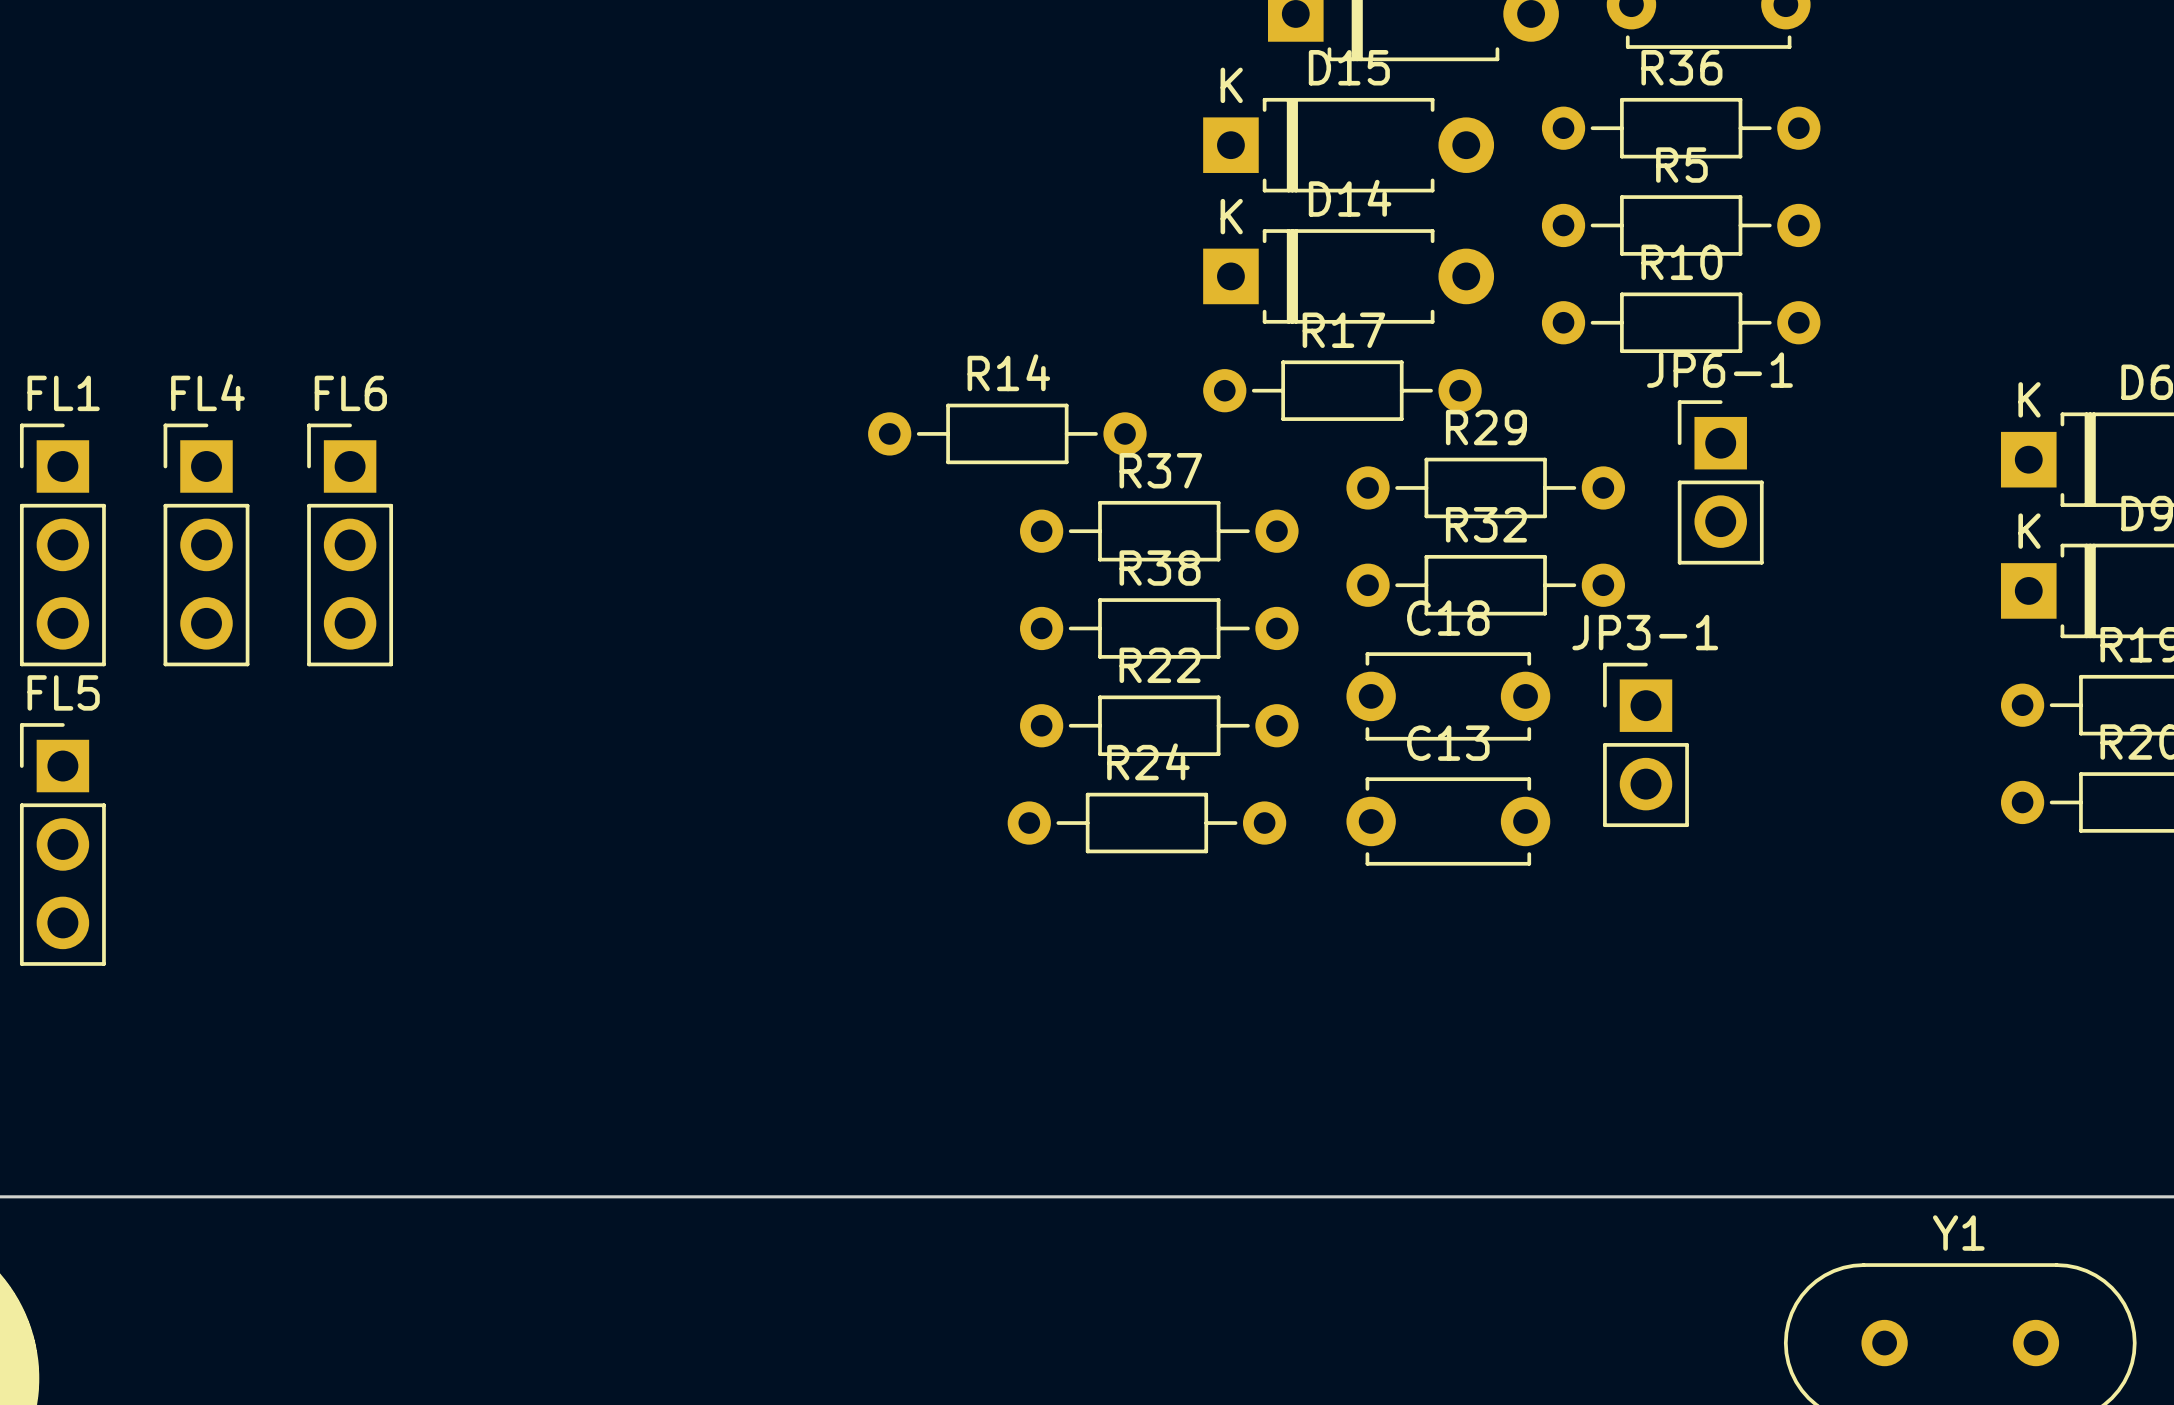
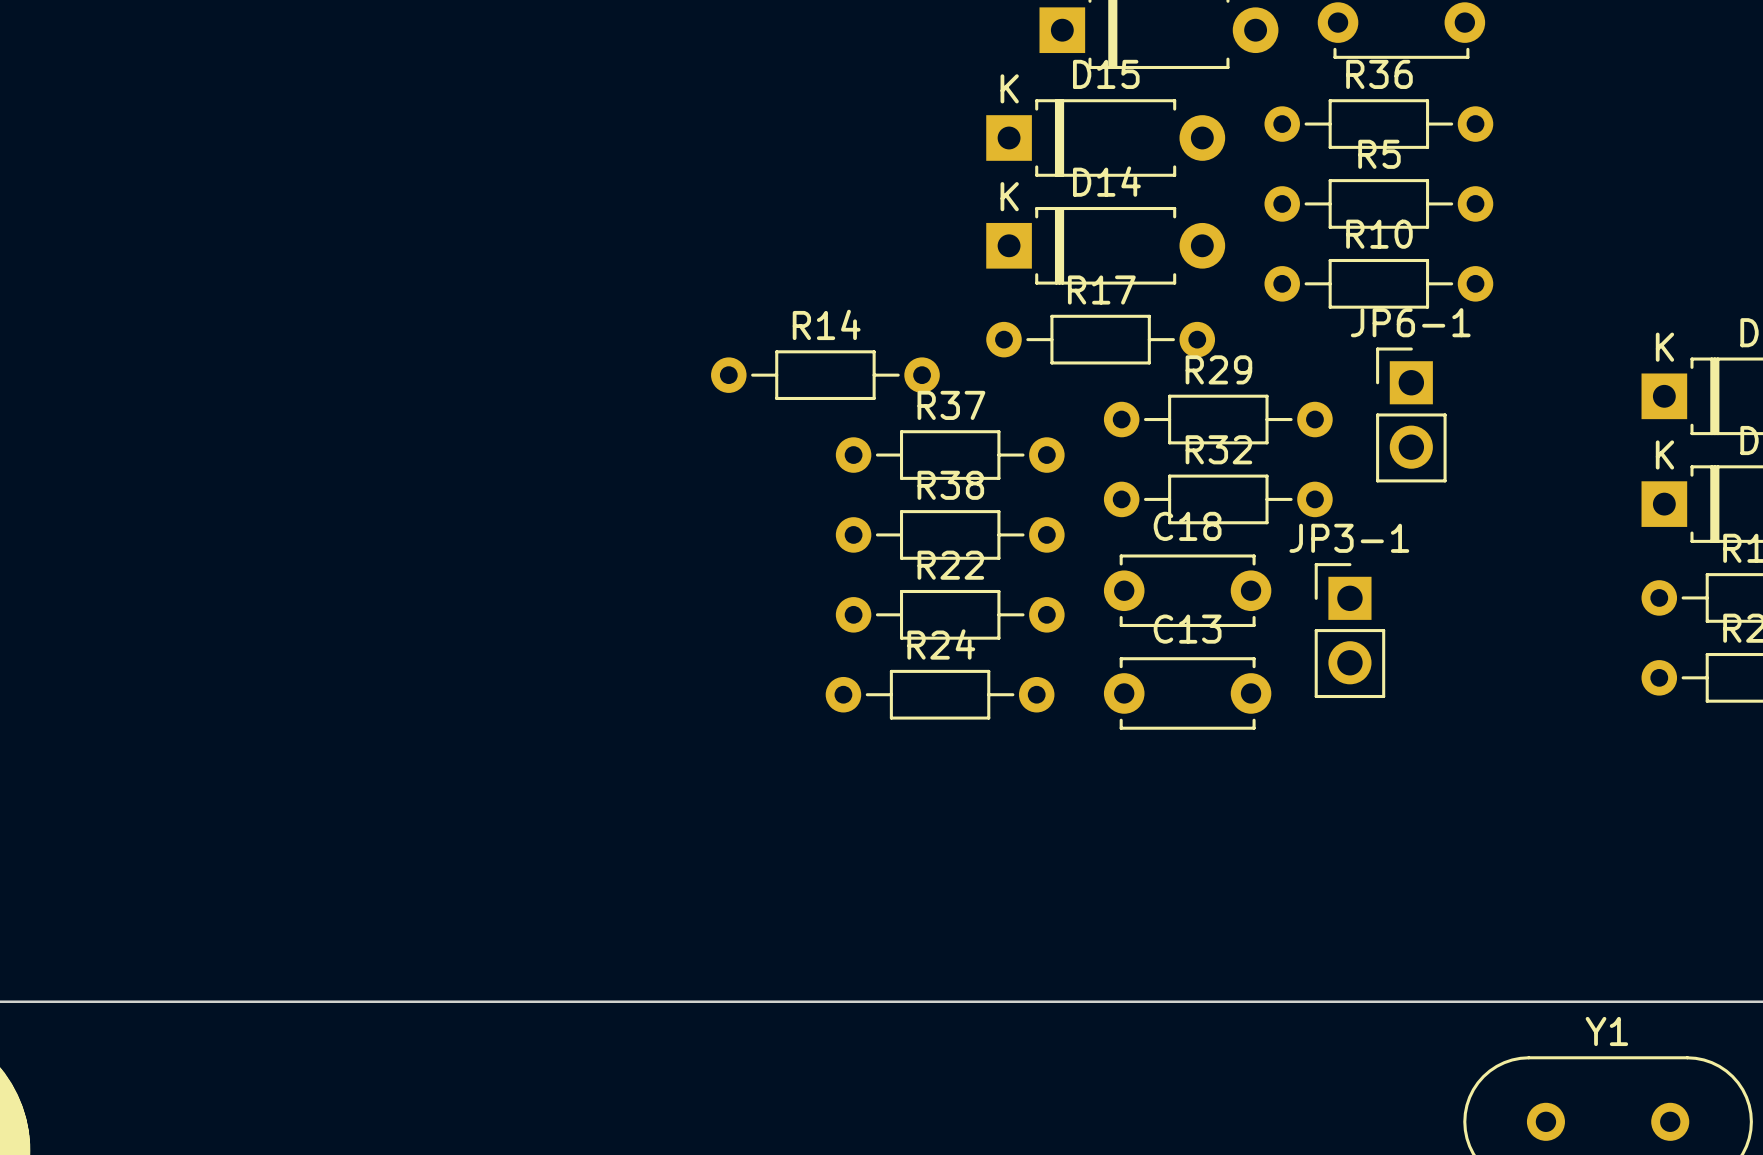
FL1: (62, 544) -> none
FL4: (206, 544) -> none
FL6: (350, 544) -> none
FL5: (62, 844) -> none

